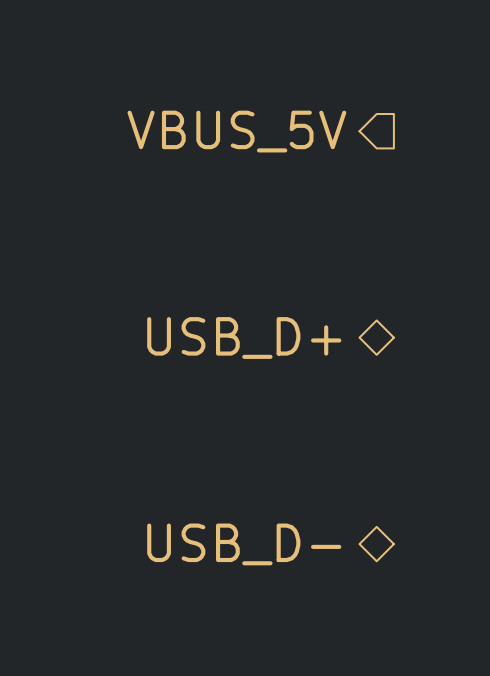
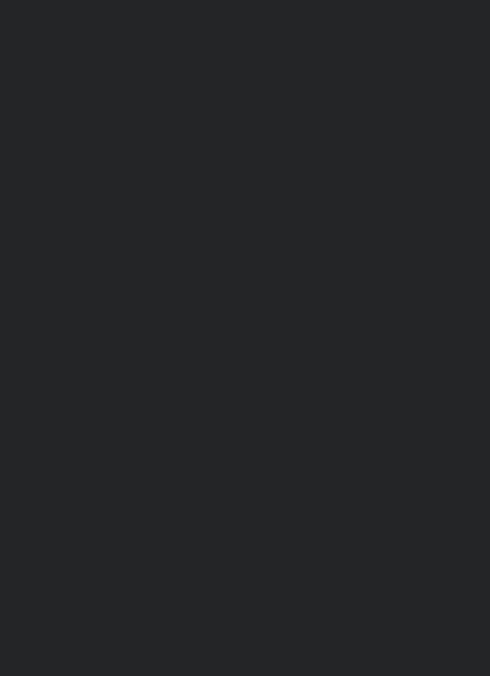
hierarchical label: VBUS_5V (236, 131) -> none
hierarchical label: USB_D+ (244, 338) -> none
hierarchical label: USB_D- (244, 544) -> none

